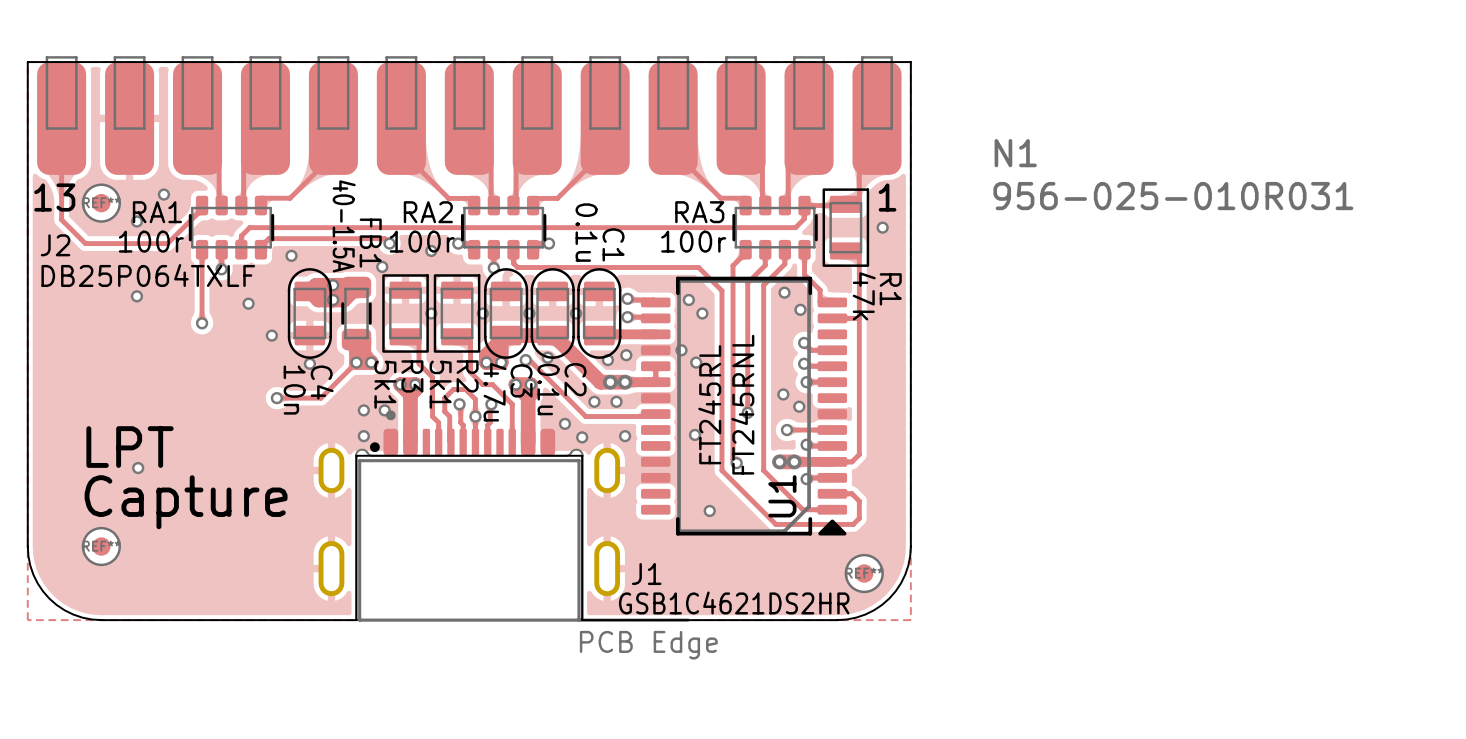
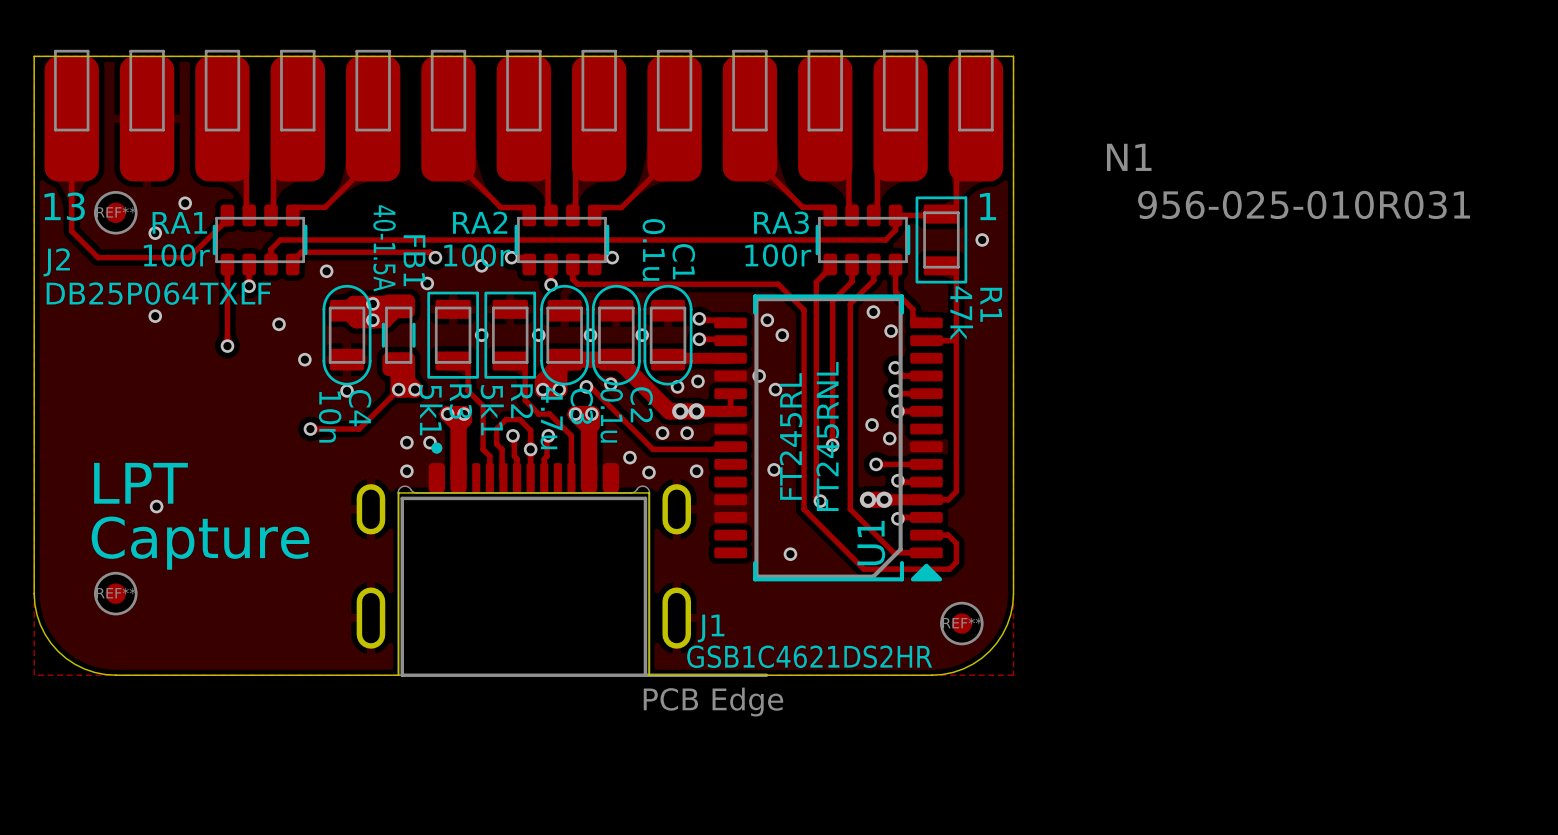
J1 footprint: [318, 410, 690, 622] -> [356, 442, 769, 677]

